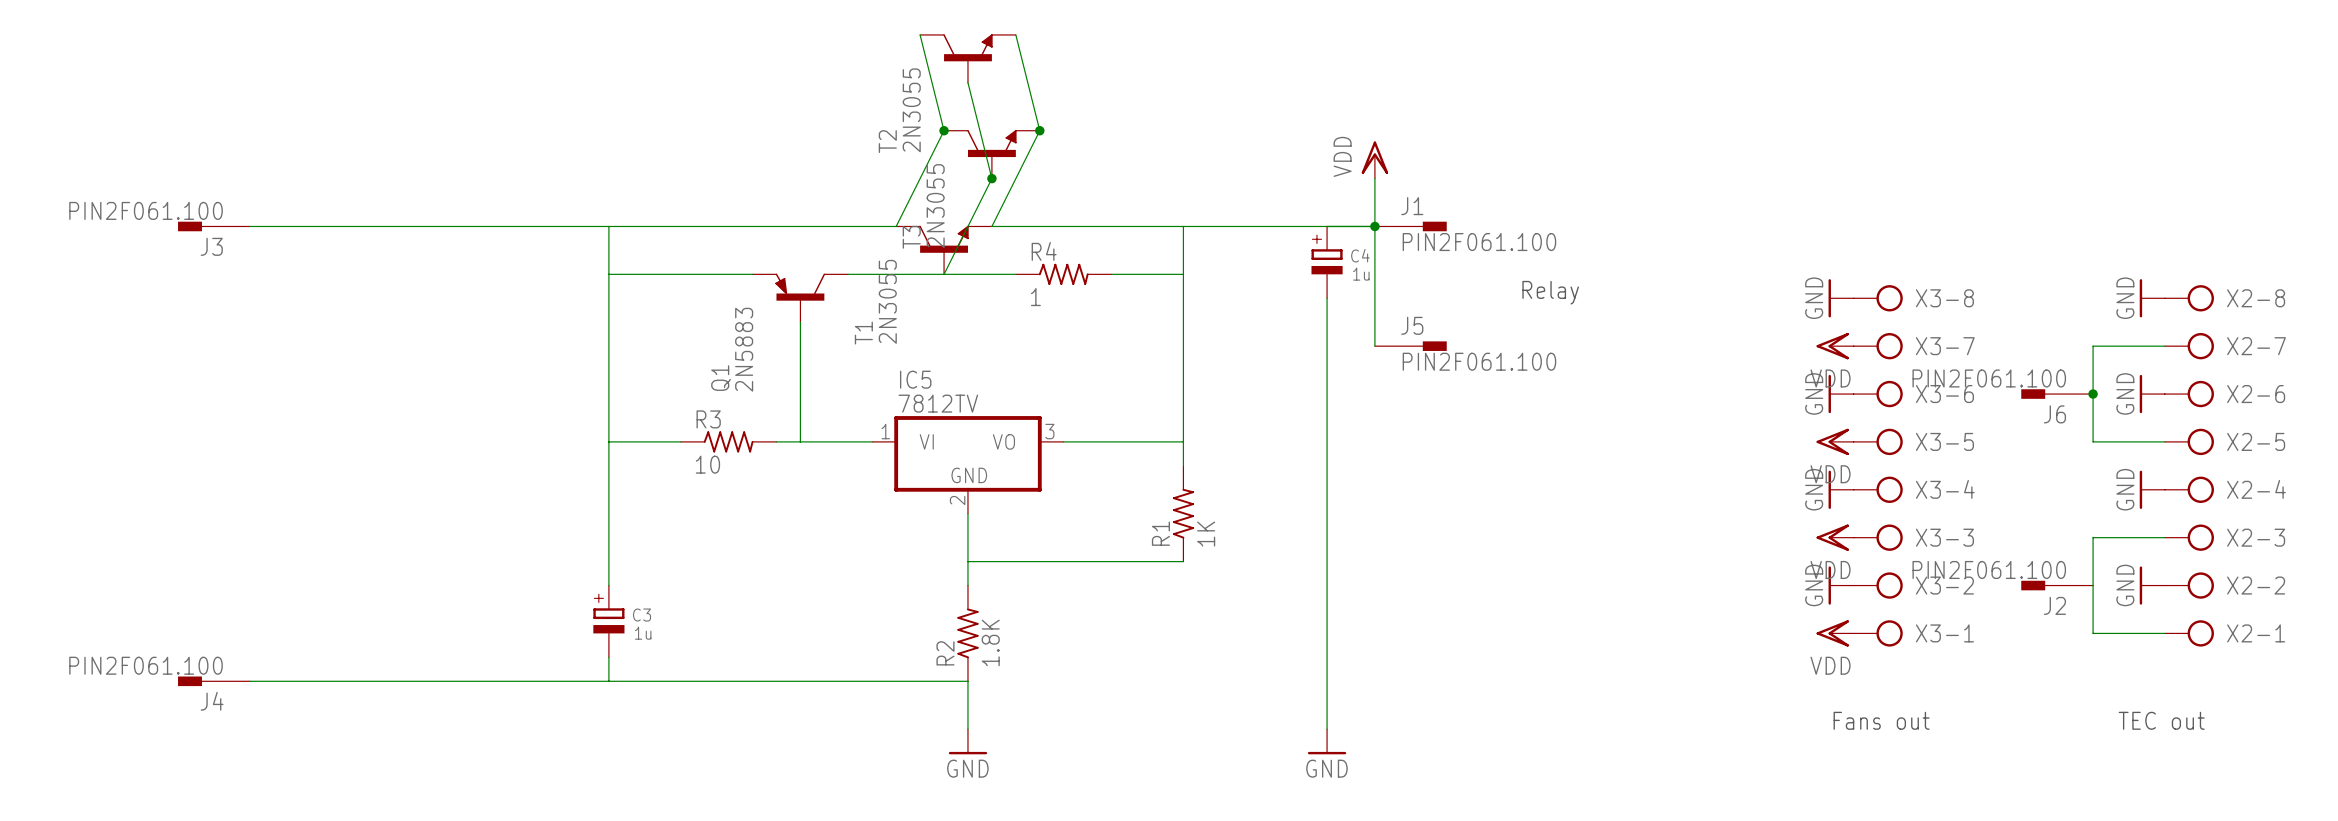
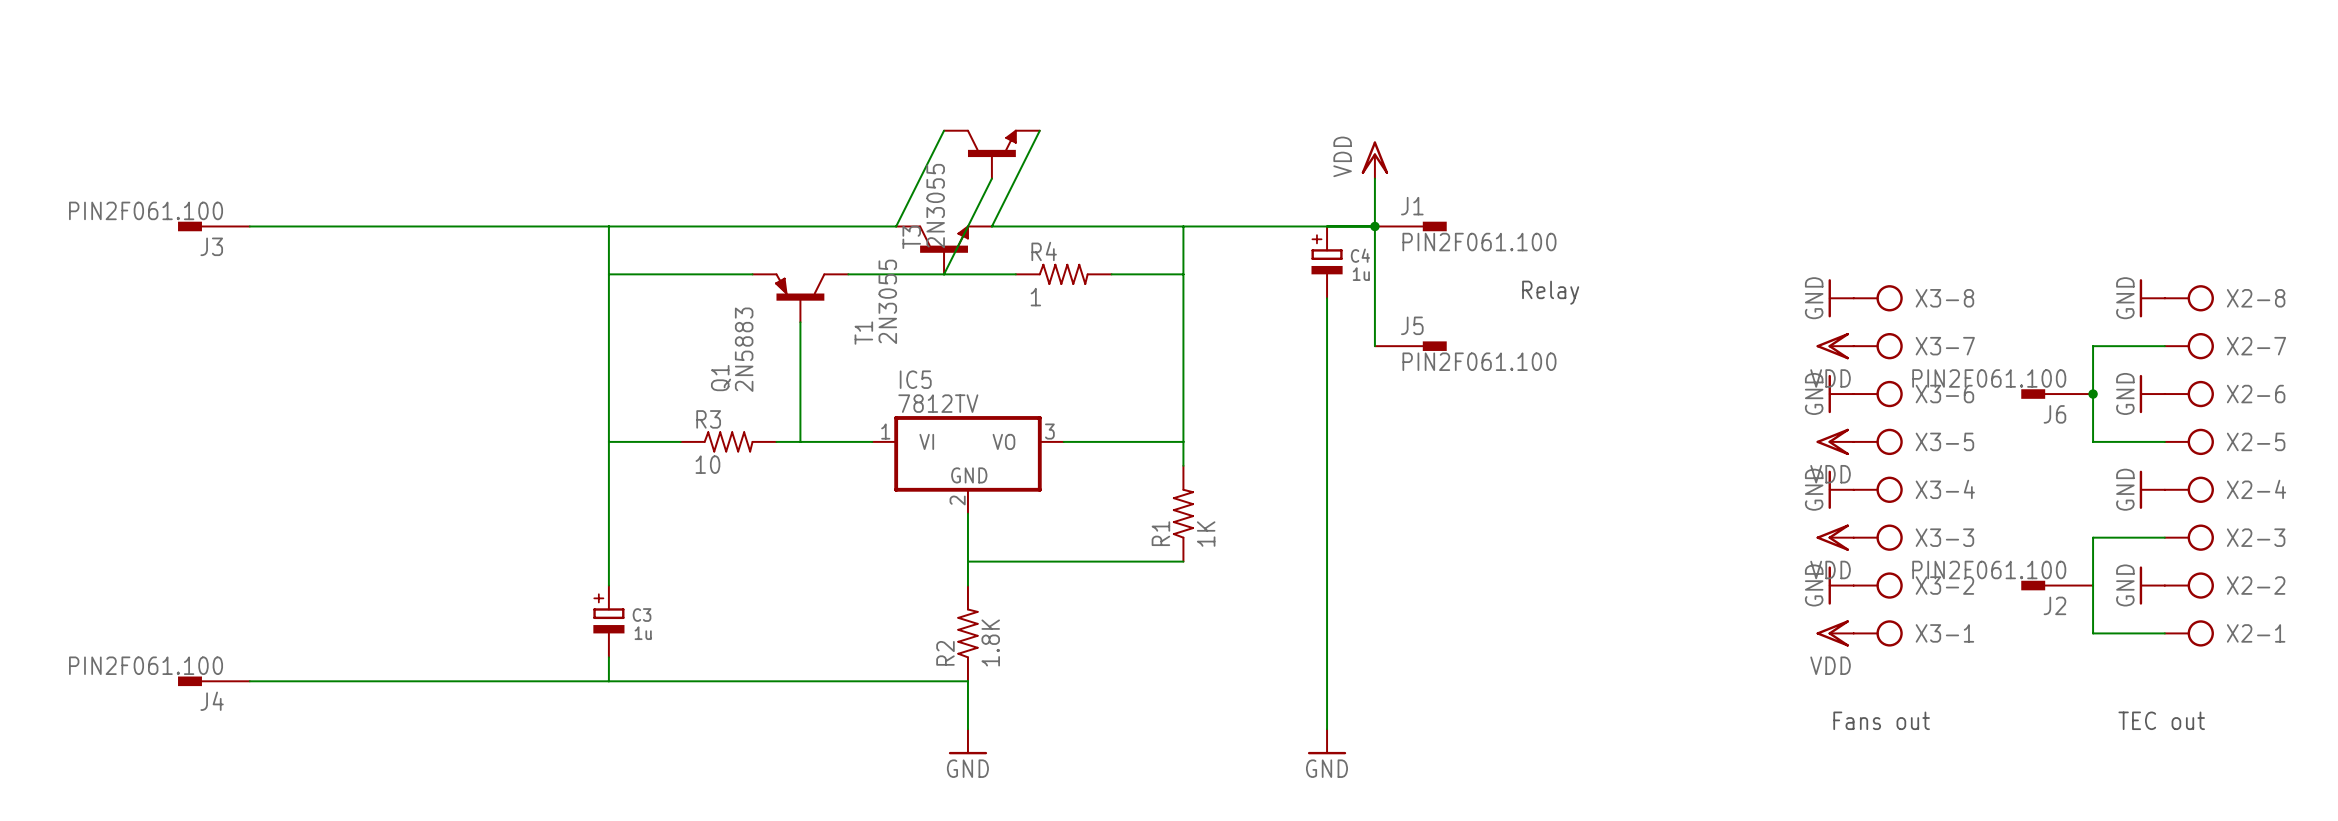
wire: (920, 34) (944, 130) -> none
wire: (1015, 34) (1039, 130) -> none
T2: 2N3055 (967, 58) -> none
wire: (967, 82) (991, 178) -> none
junction: (944, 130) -> none
junction: (1039, 130) -> none
junction: (991, 178) -> none

